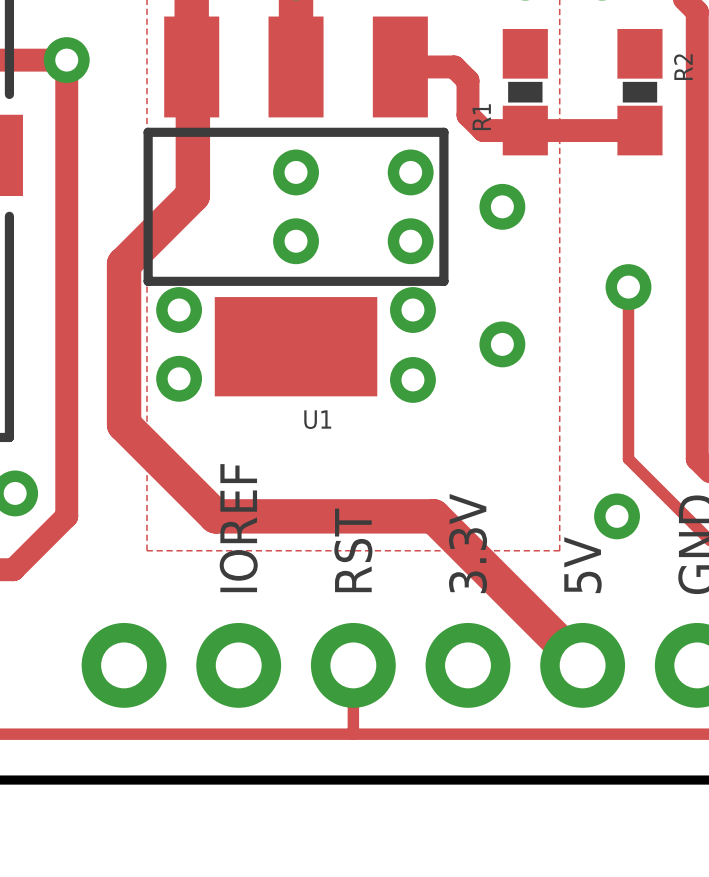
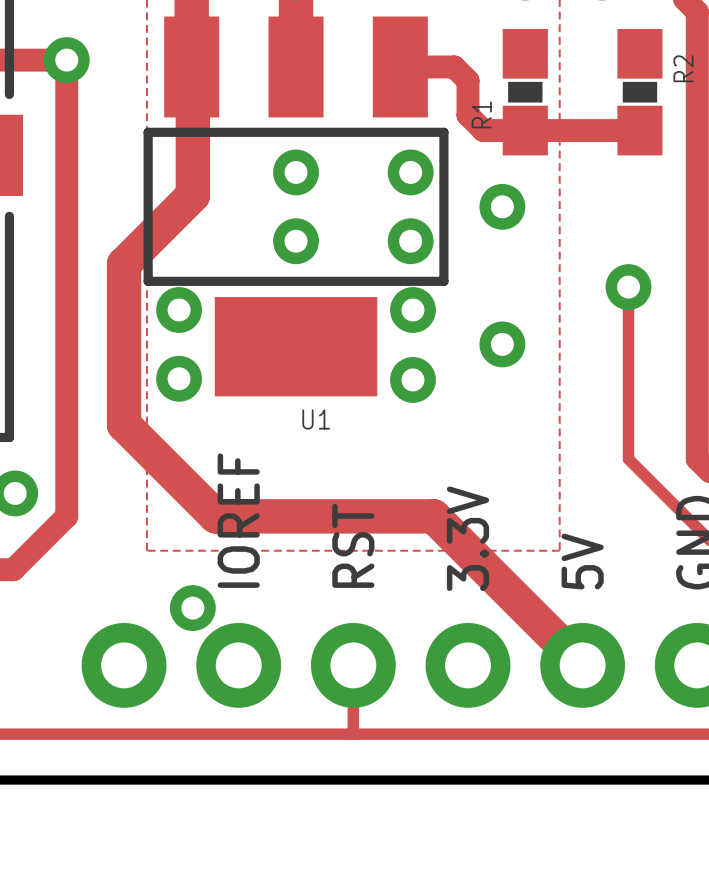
via: (617, 516) -> none
via: none -> (192, 608)

